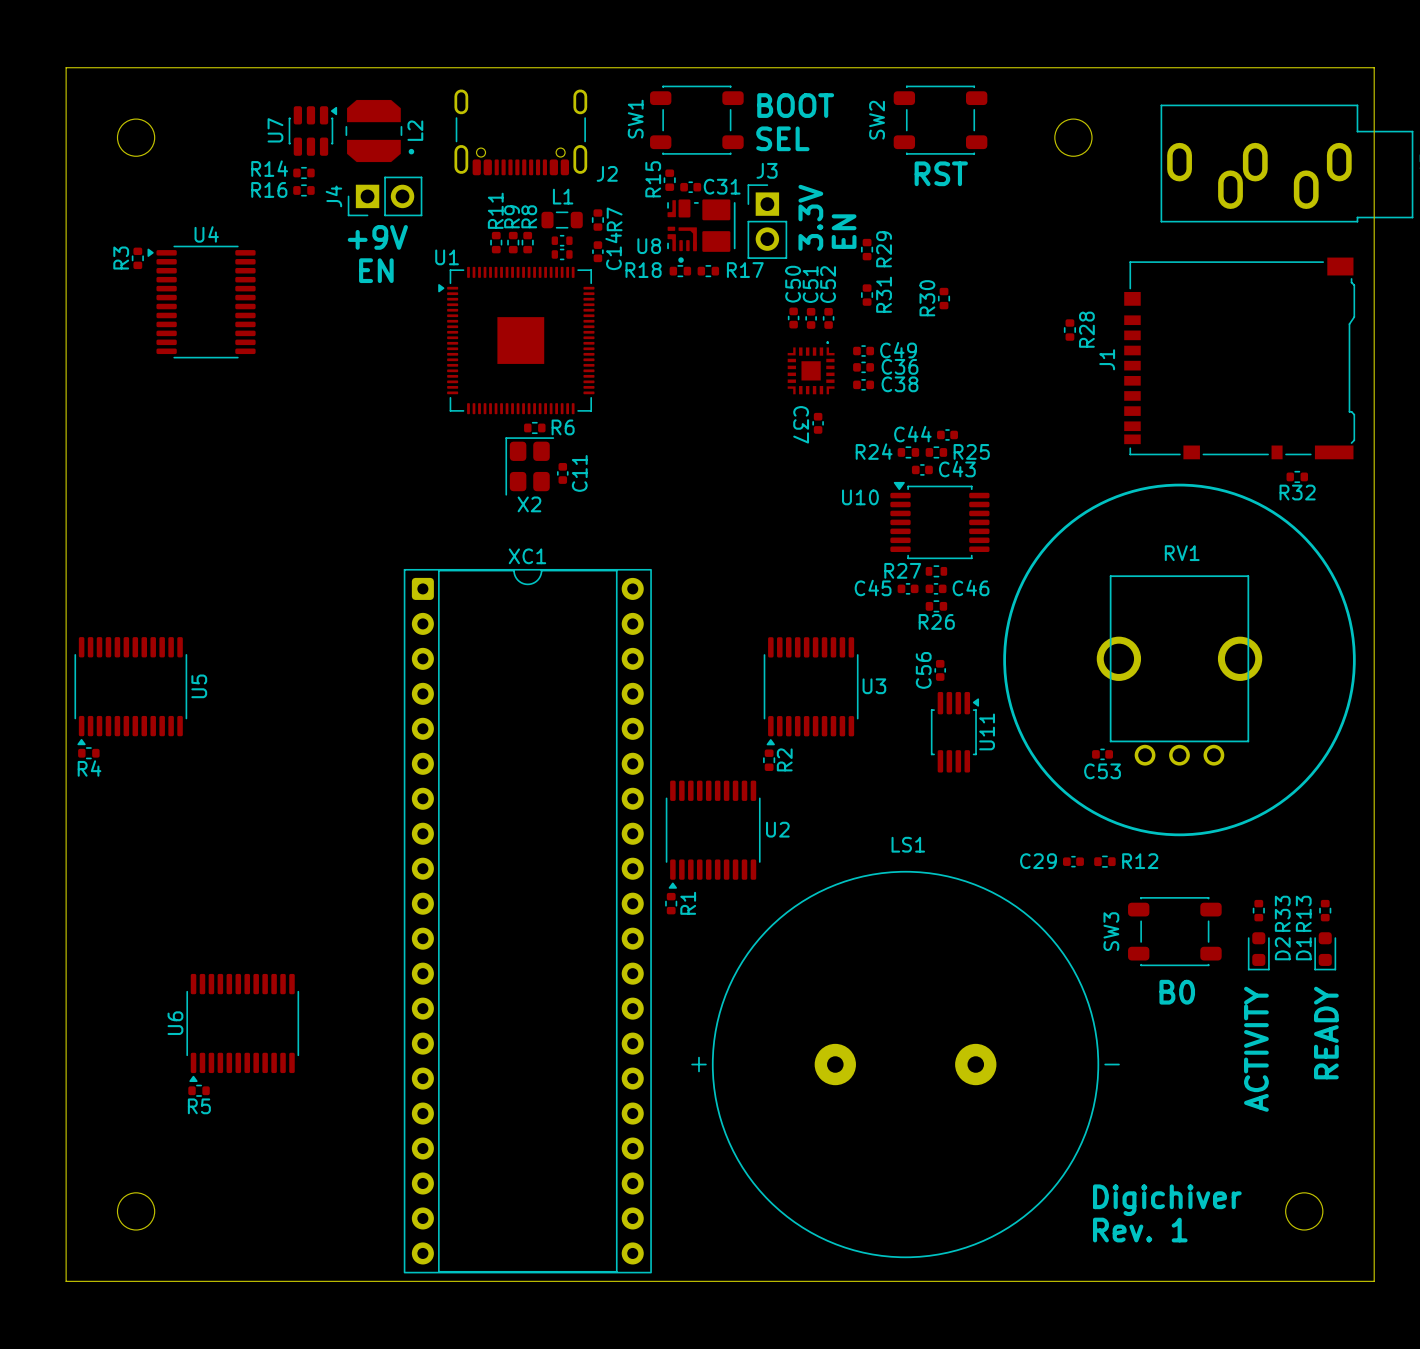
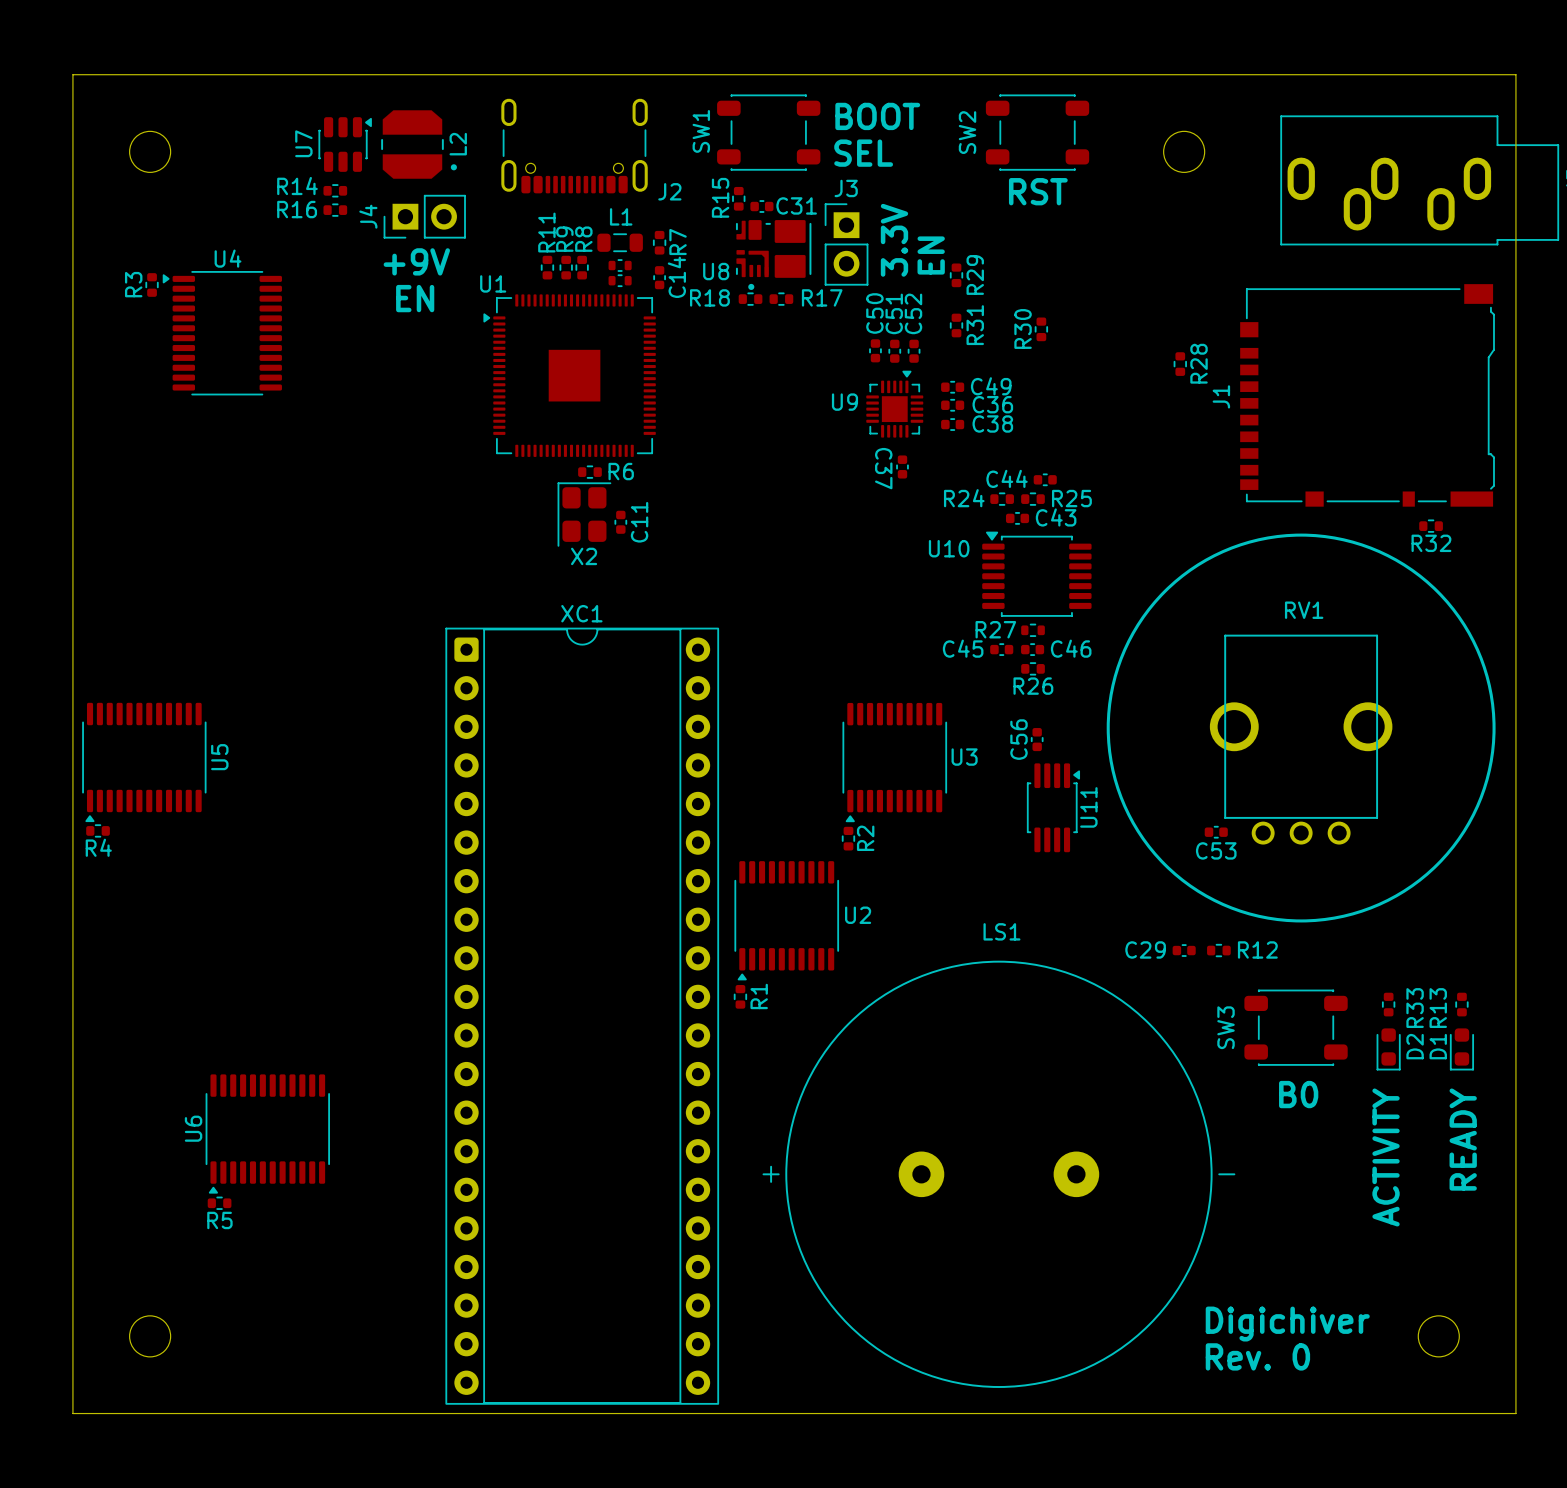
U9: none -> (894, 404)
part: (811, 367) -> none
text: Rev. 1 (1140, 1230) -> Rev. 0 (1257, 1356)

